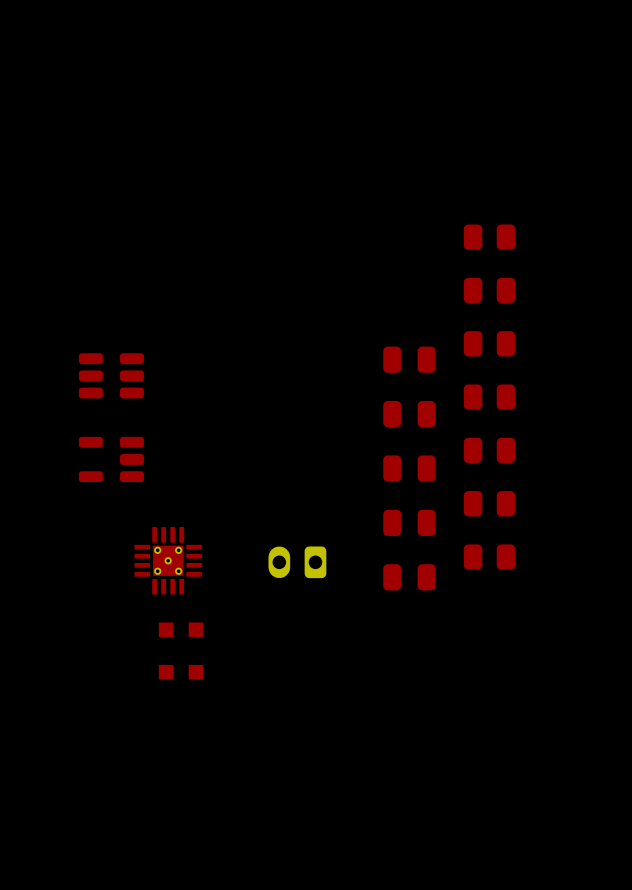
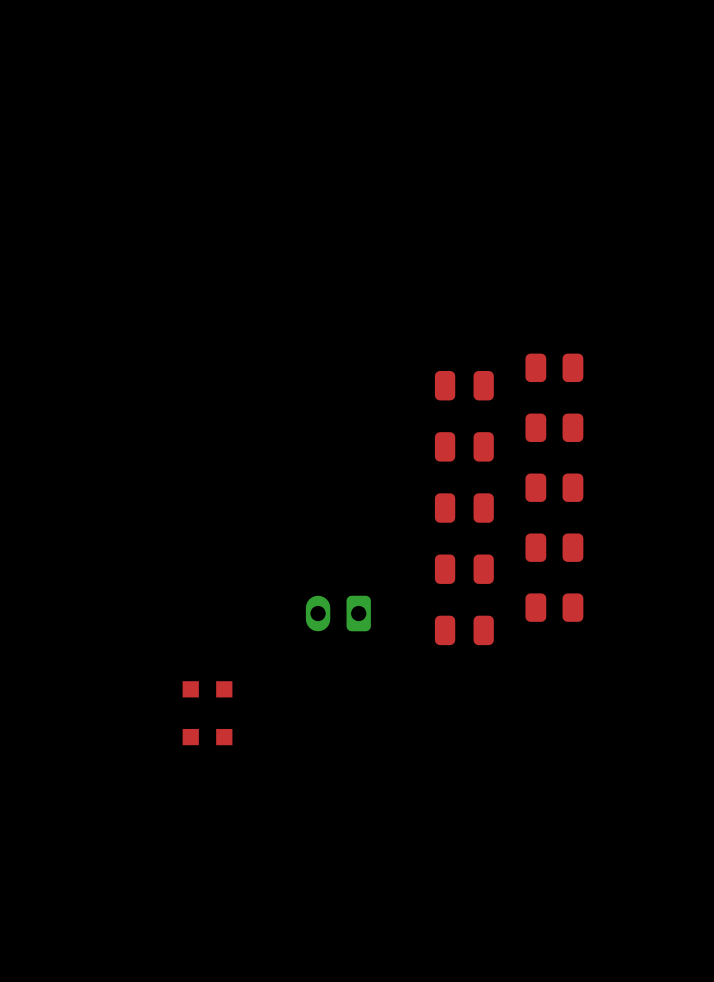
part: (489, 237) -> none
part: (489, 290) -> none
part: (111, 375) -> none
part: (111, 459) -> none
part: (168, 560) -> none

